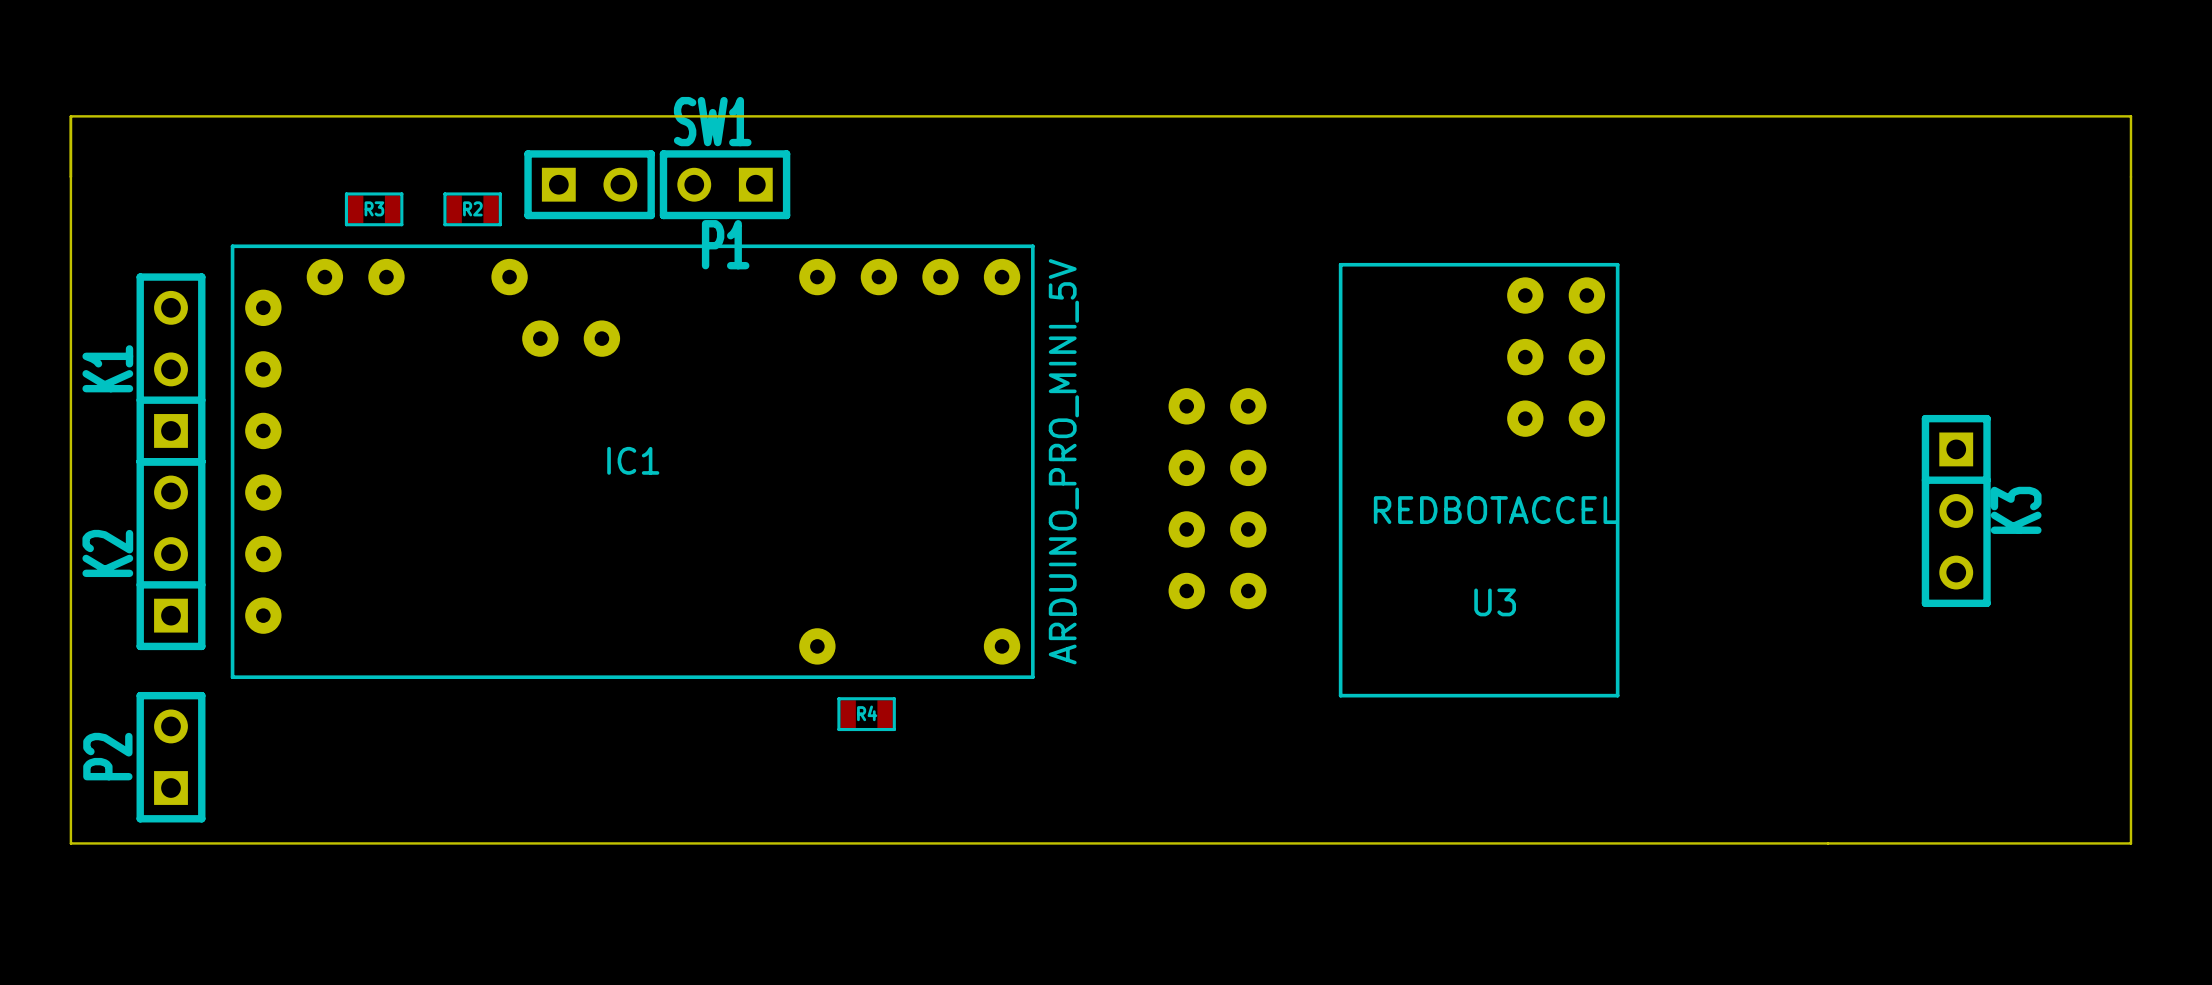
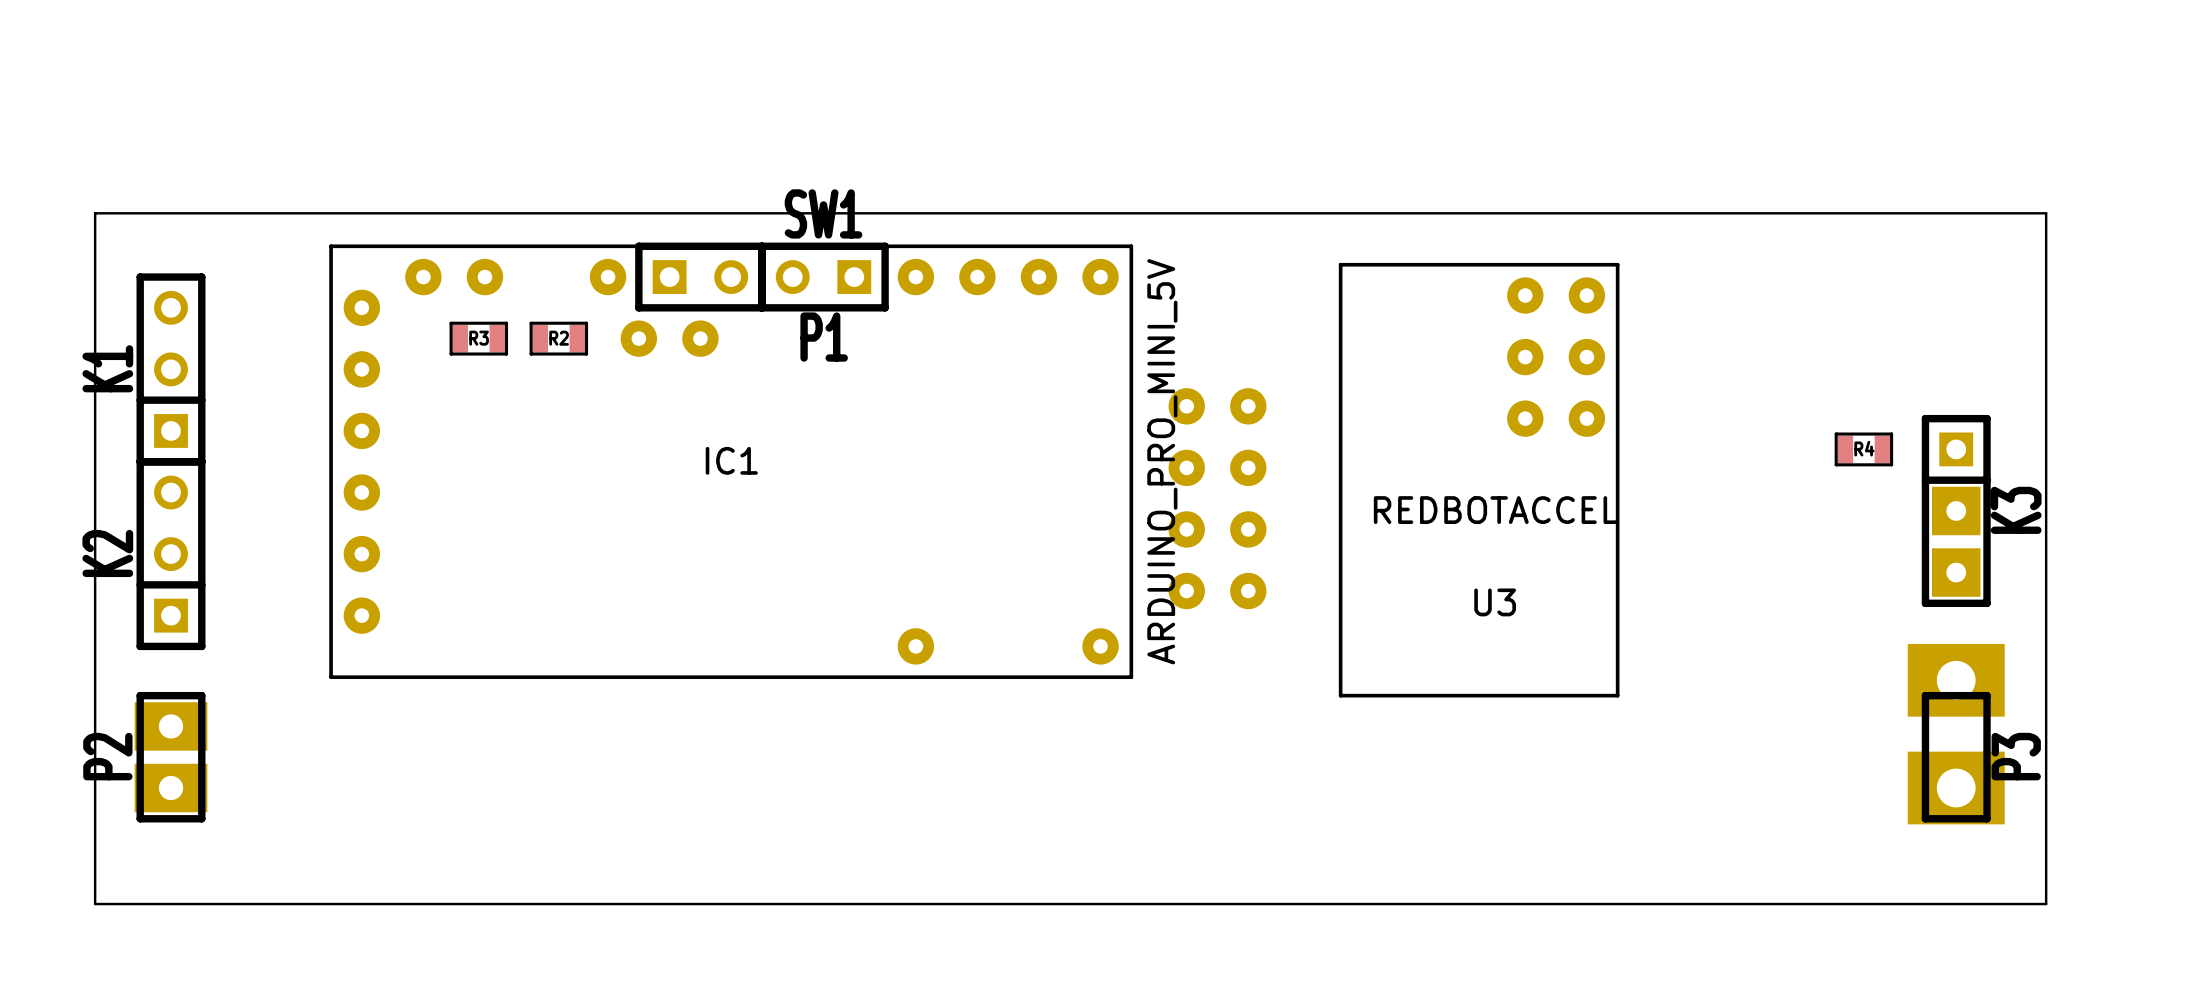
board edge: (70, 116) (2130, 116) (2130, 843) (70, 843) (70, 116) -> (95, 213) (95, 904) (2046, 904) (2046, 213) (95, 213)
SW1 position: (589, 184) -> (700, 277)
P1 position: (725, 184) -> (823, 277)
R3 position: (374, 209) -> (478, 338)
R2 position: (472, 209) -> (558, 338)
K3 footprint: [1921, 414, 1991, 608] -> [1921, 414, 1991, 608]
IC1 position: (632, 461) -> (731, 461)
P2 footprint: [136, 691, 206, 823] -> [134, 691, 208, 823]
R4 position: (866, 714) -> (1863, 449)
P3: none -> (1956, 734)

